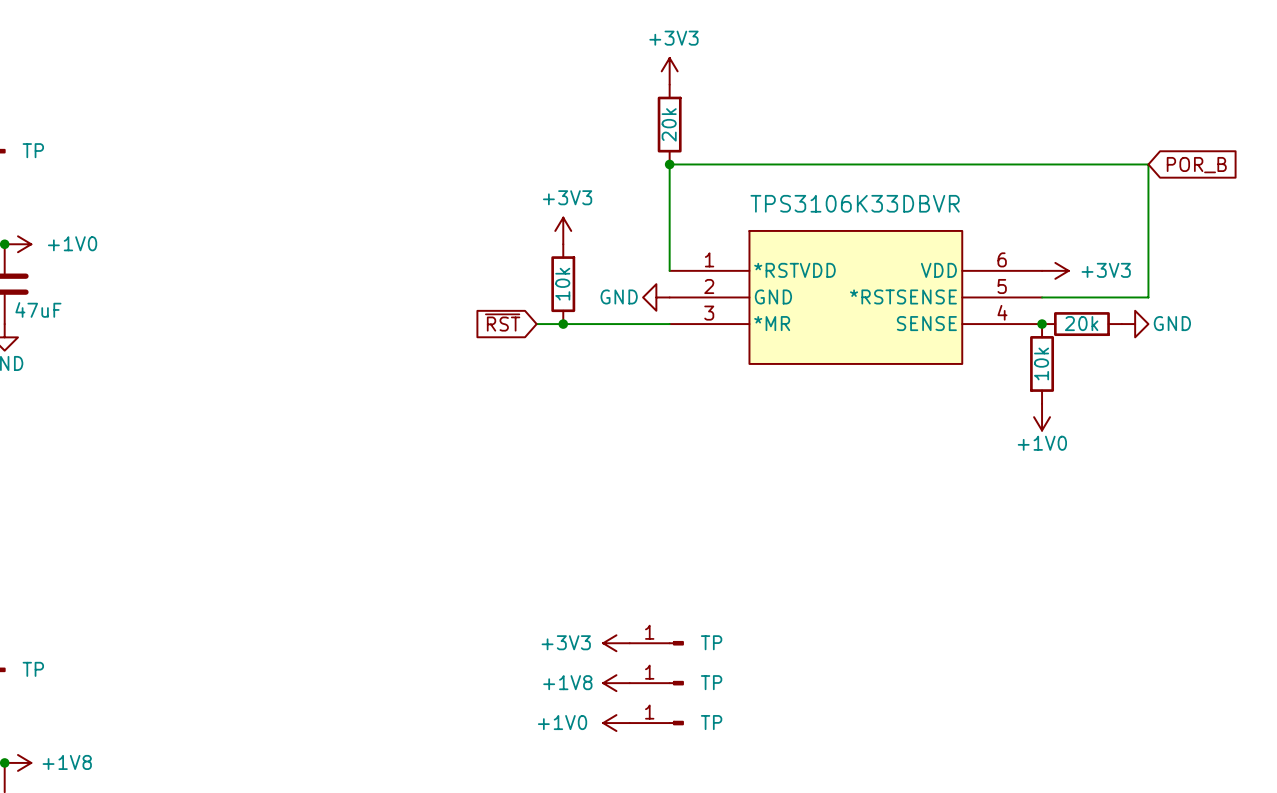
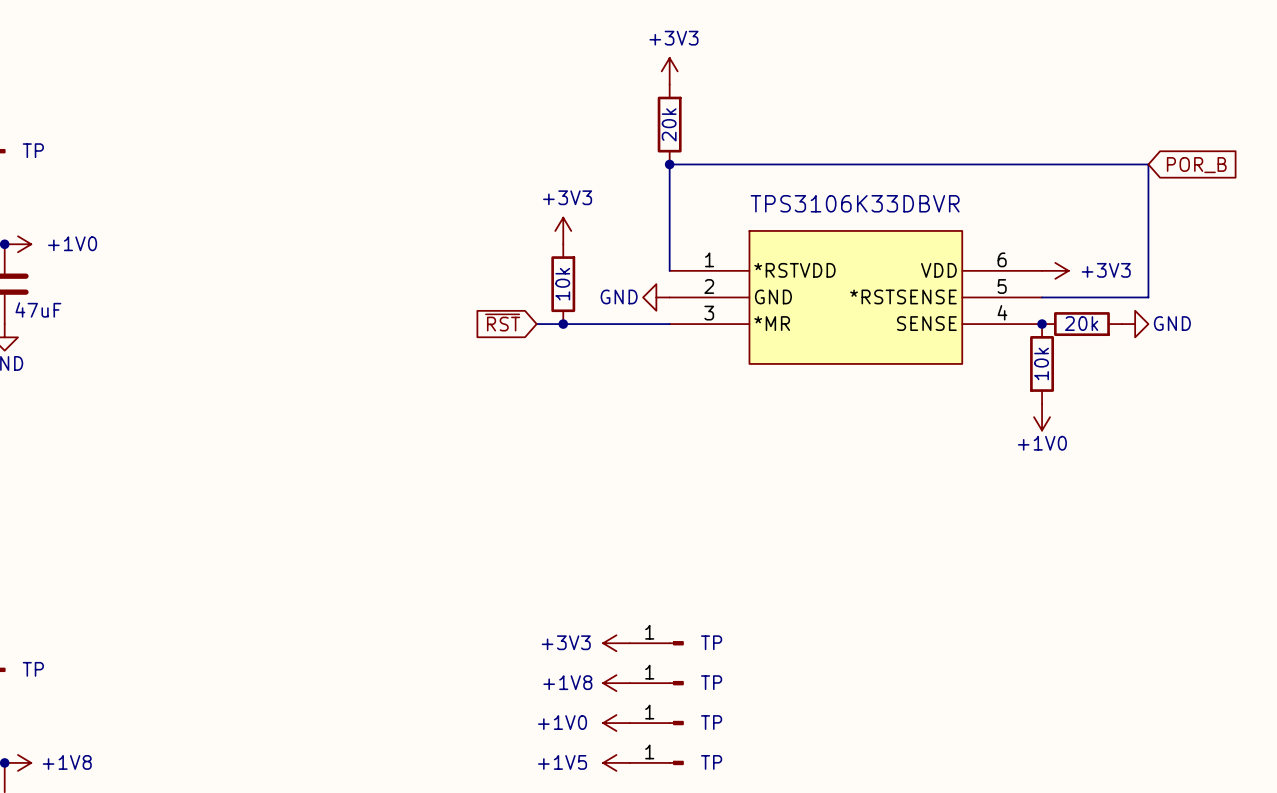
power symbol: none -> +1V5 (616, 762)
part: none -> TP (656, 762)

